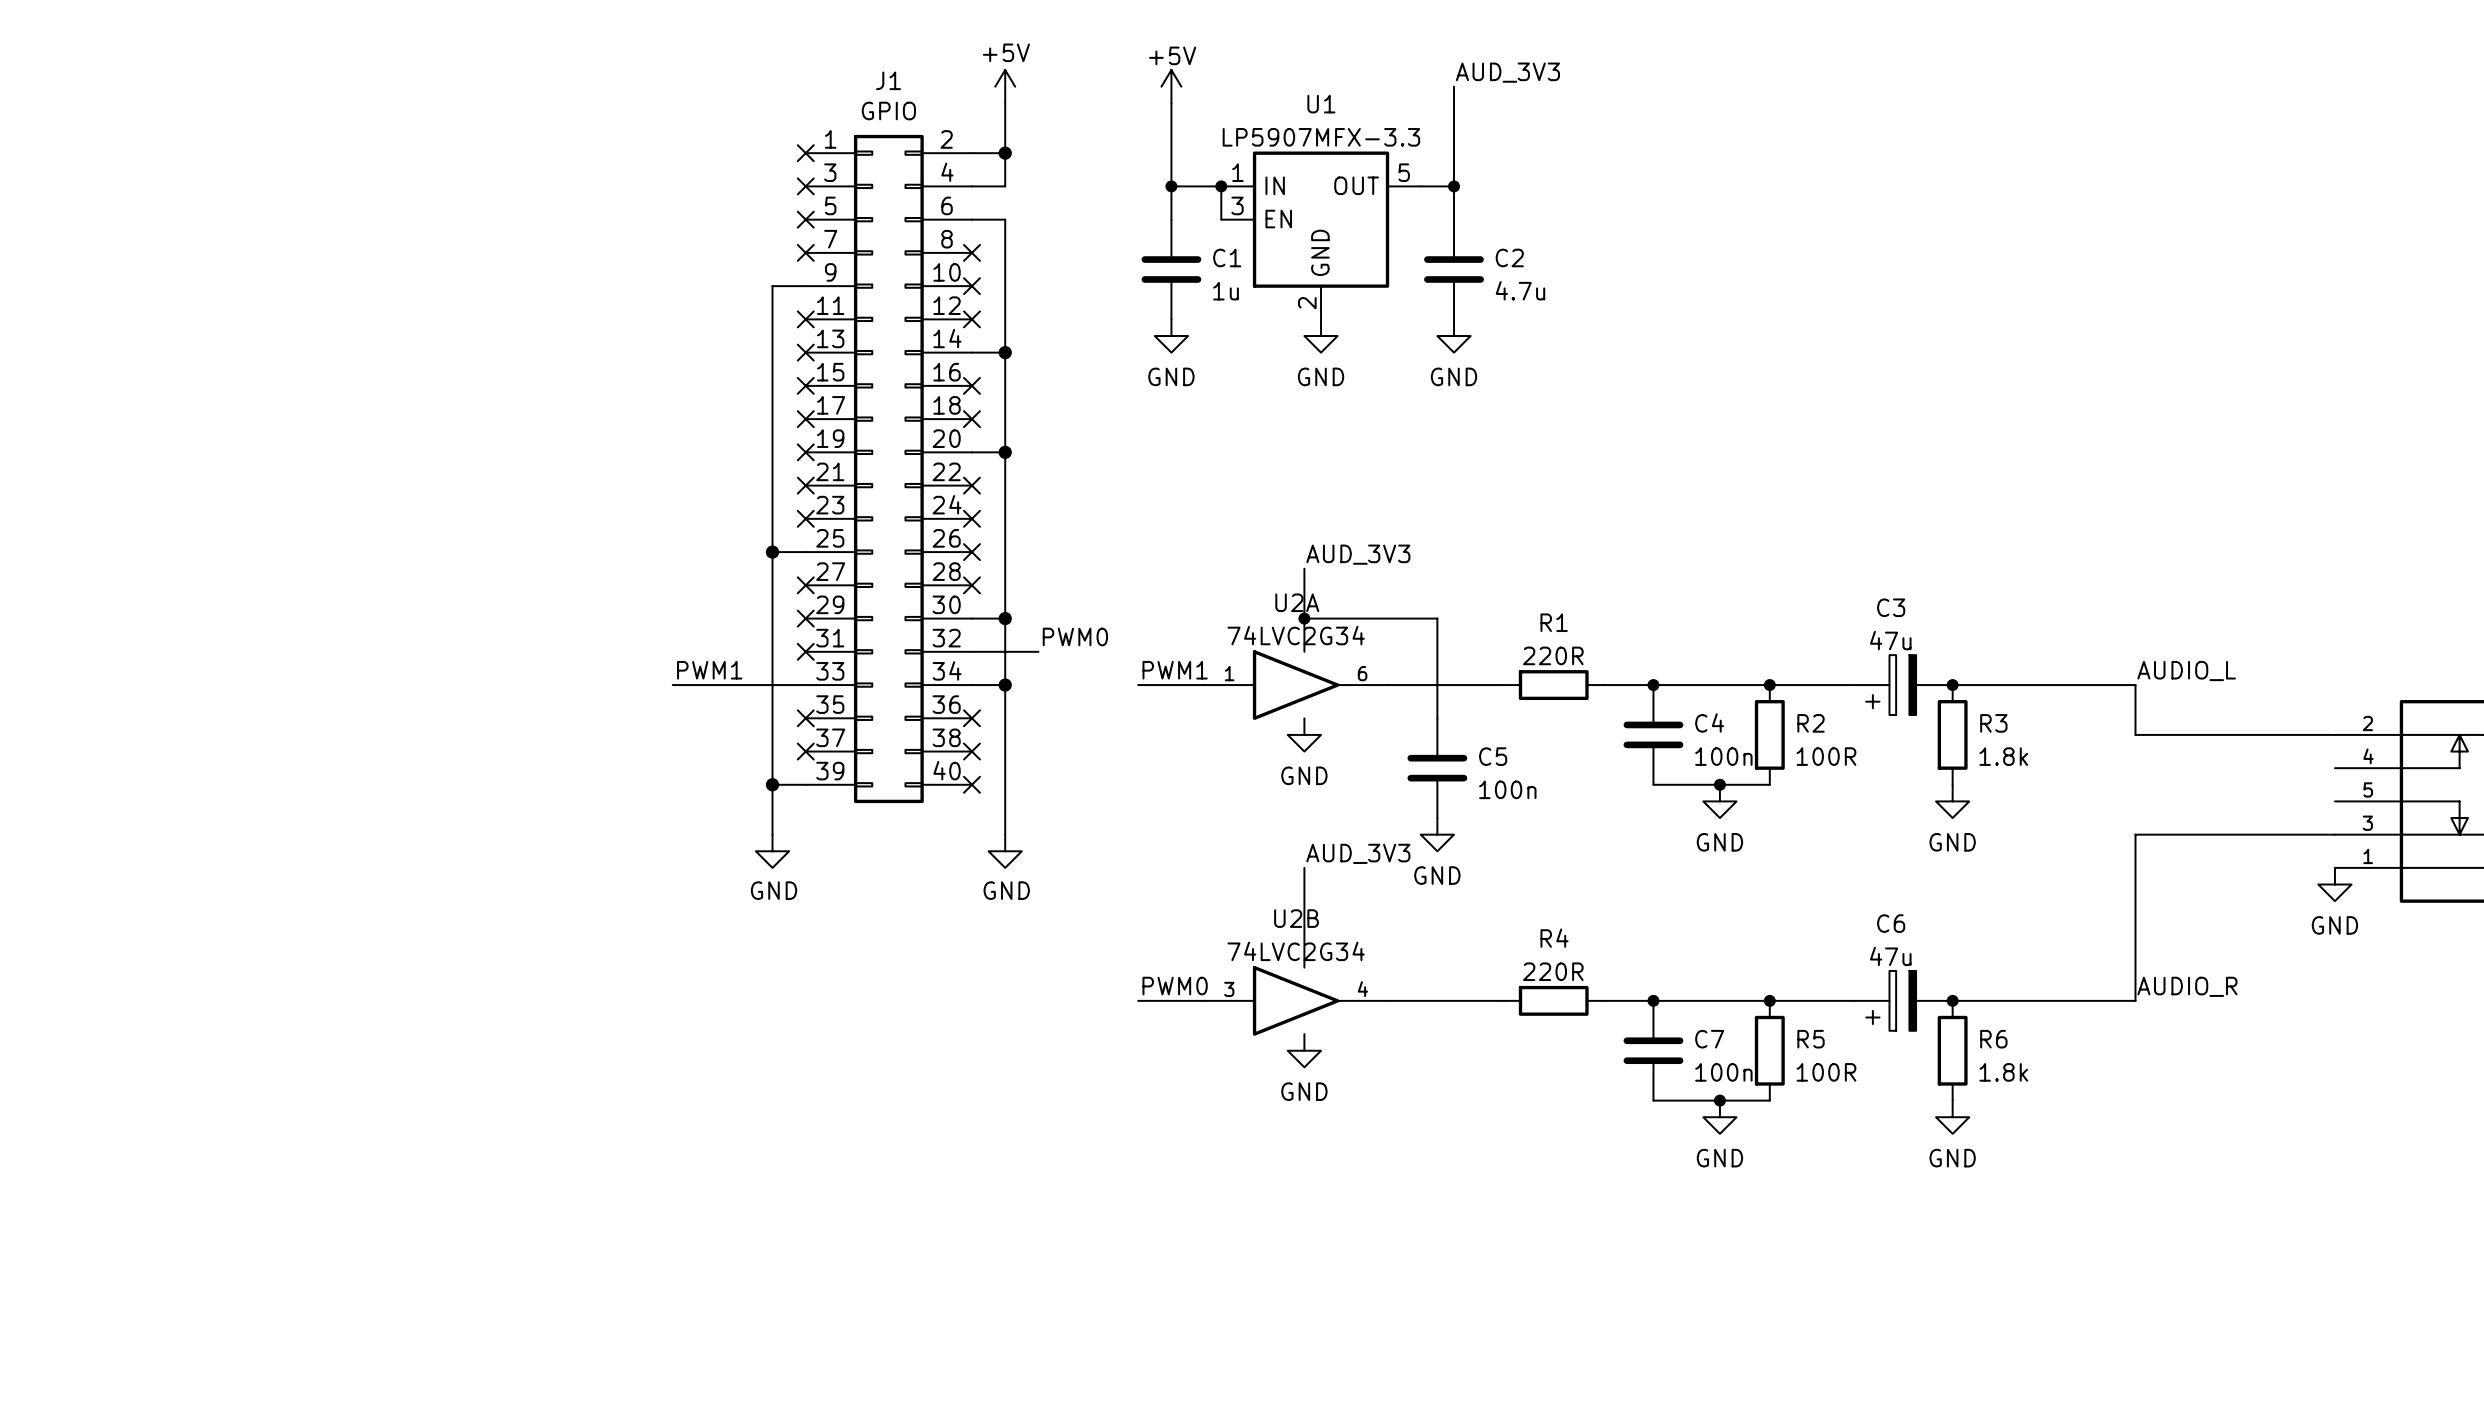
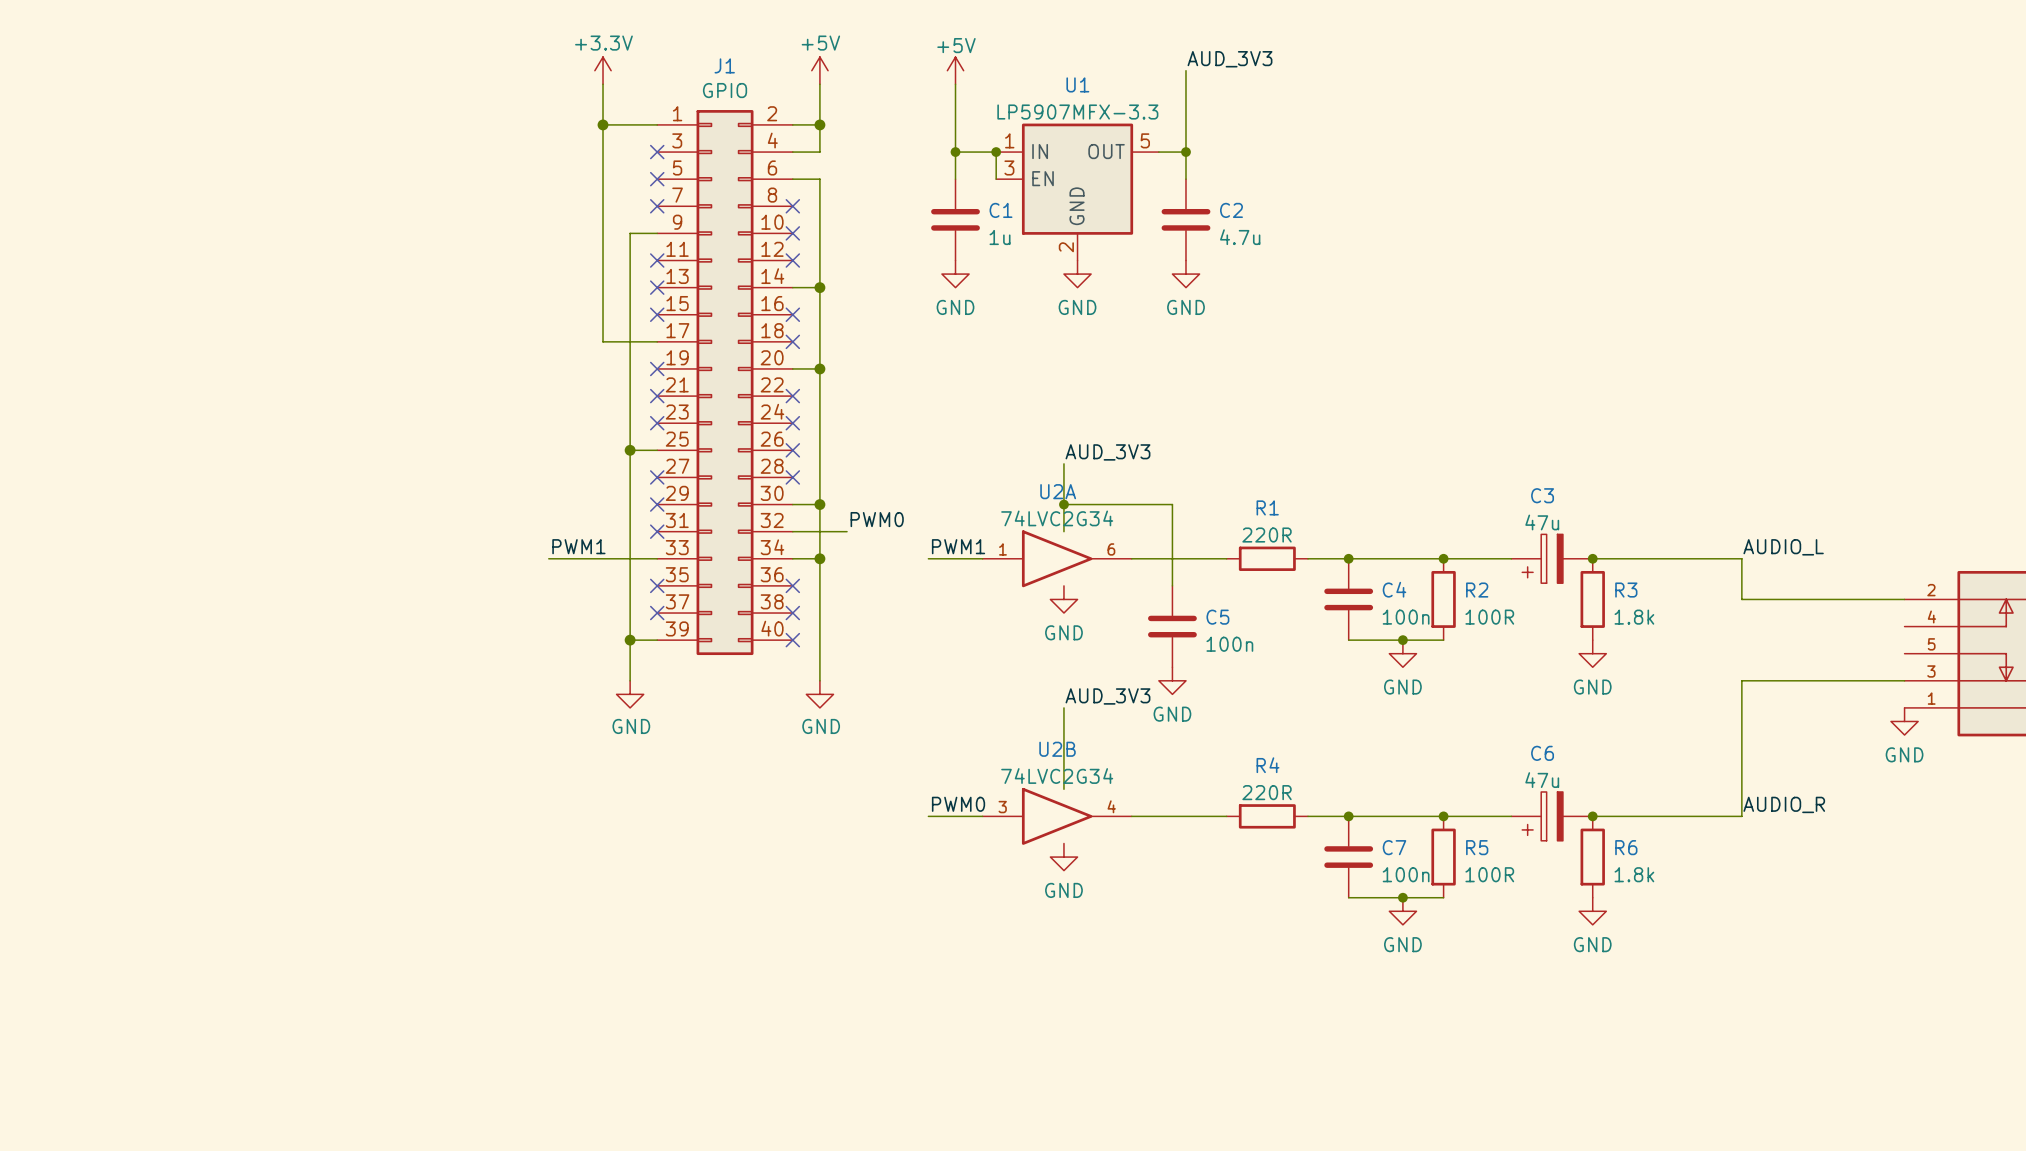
power symbol: none -> +3.3V (603, 70)
wire: none -> (603, 84) (603, 341) (657, 341)
wire: none -> (603, 124) (657, 124)
junction: none -> (603, 124)
no-connect mark: (805, 153) -> none
no-connect mark: (805, 419) -> none

